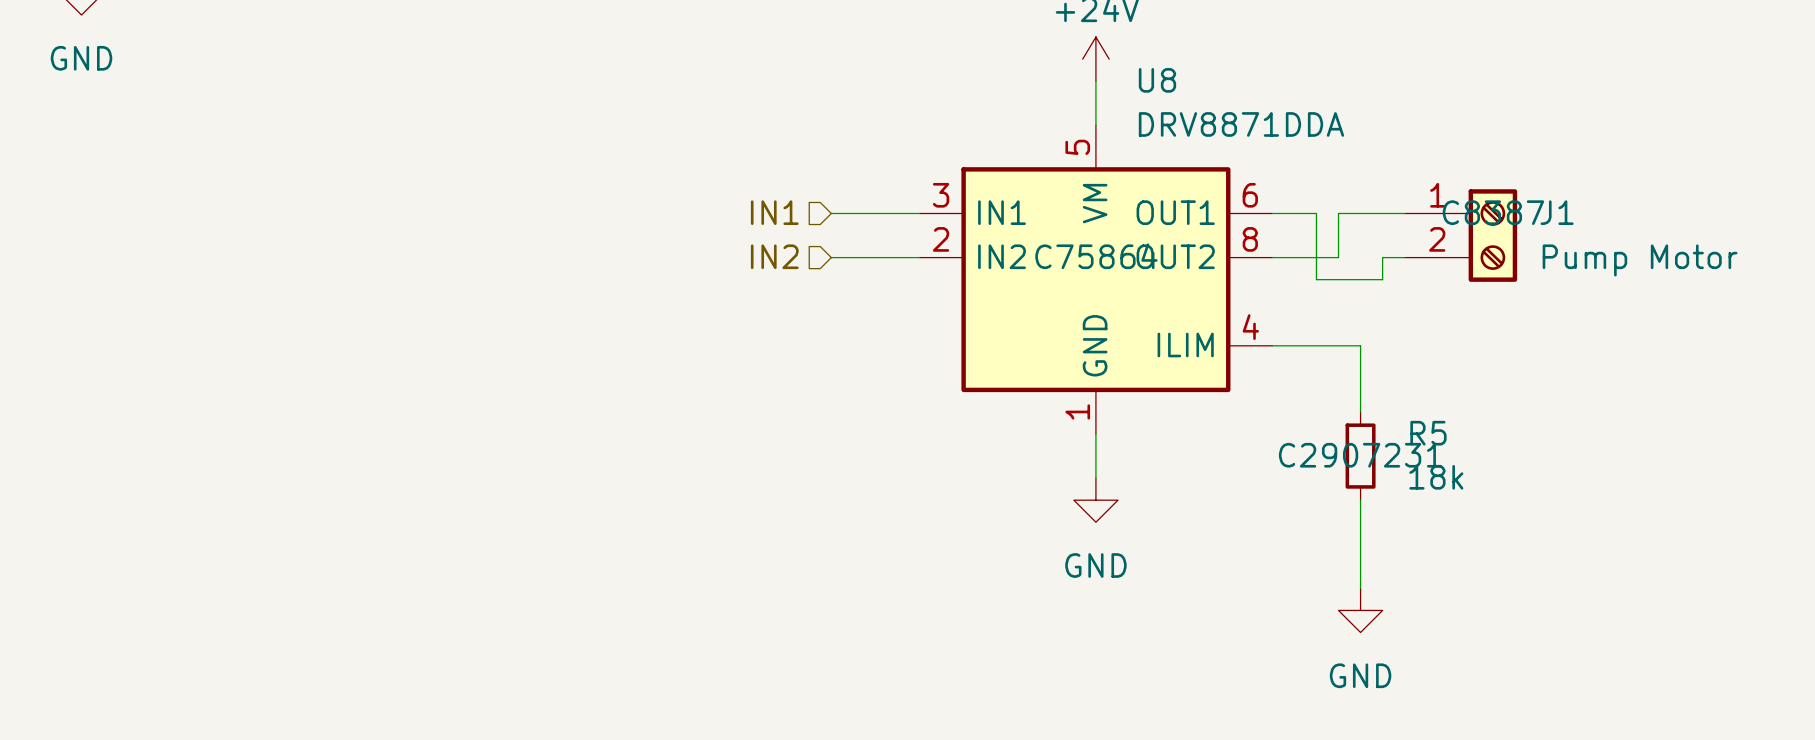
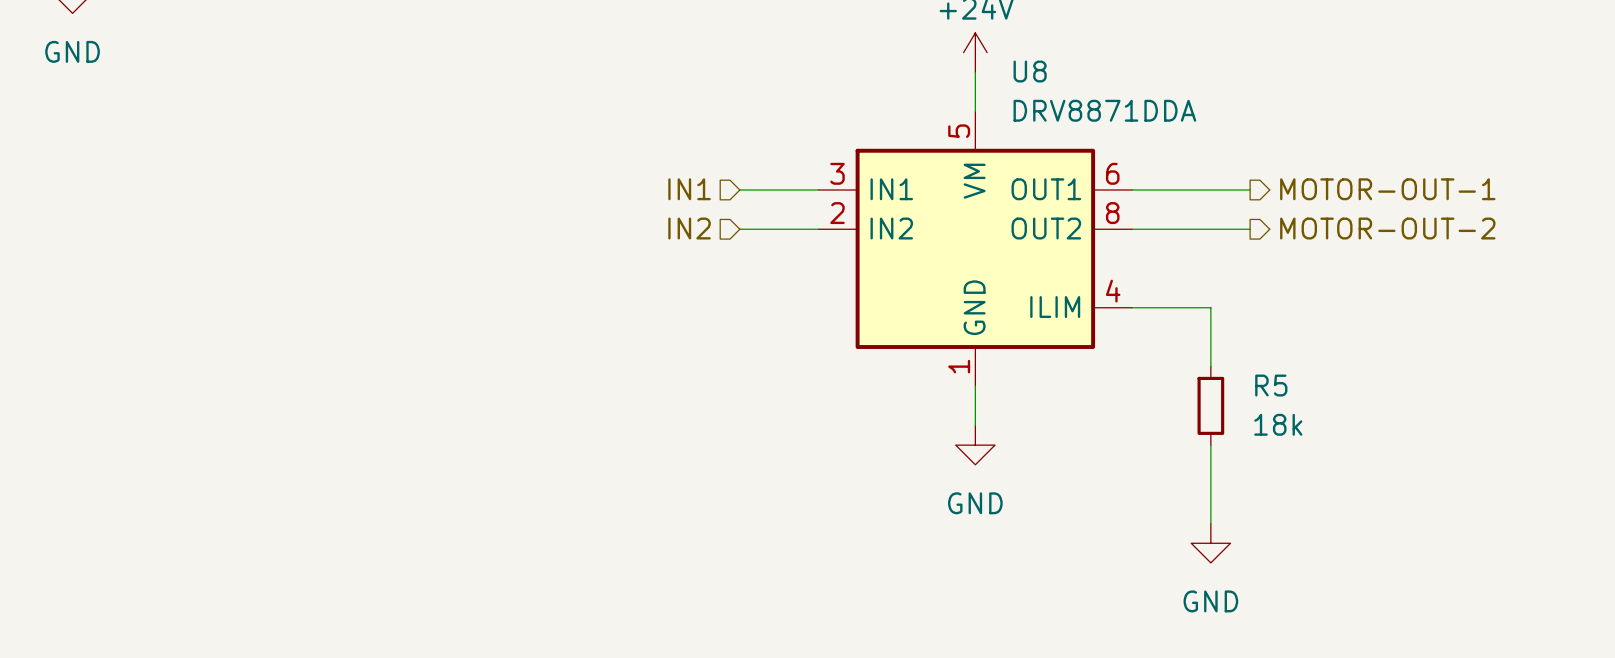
hierarchical label: none -> MOTOR-OUT-1 (1387, 189)
wire: (1316, 213) (1316, 279) (1382, 279) (1382, 257) -> (1191, 229) (1230, 229)
wire: (1338, 213) (1338, 257) -> (1191, 190) (1171, 190)
J1: Pump Motor (1460, 235) -> none
U8 text: C75864 (1096, 256) -> none
hierarchical label: none -> MOTOR-OUT-2 (1387, 228)
R5 text: C2907231 (1360, 455) -> none

